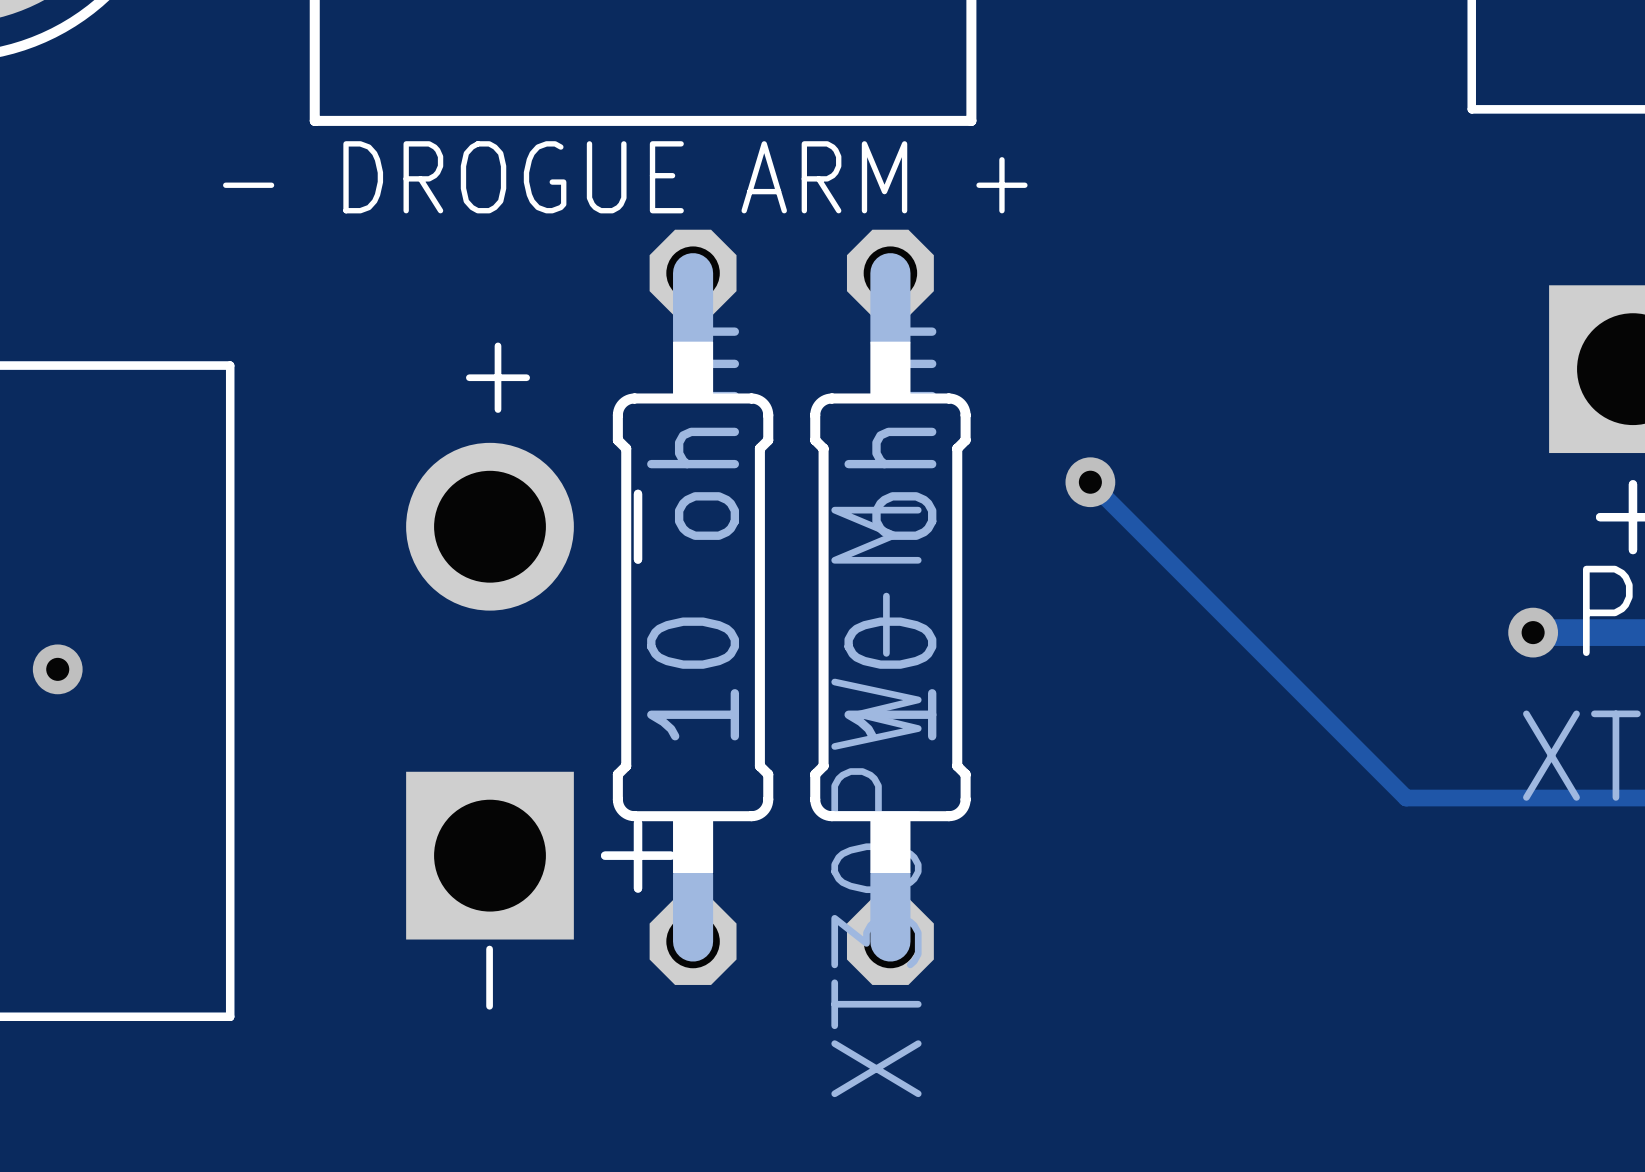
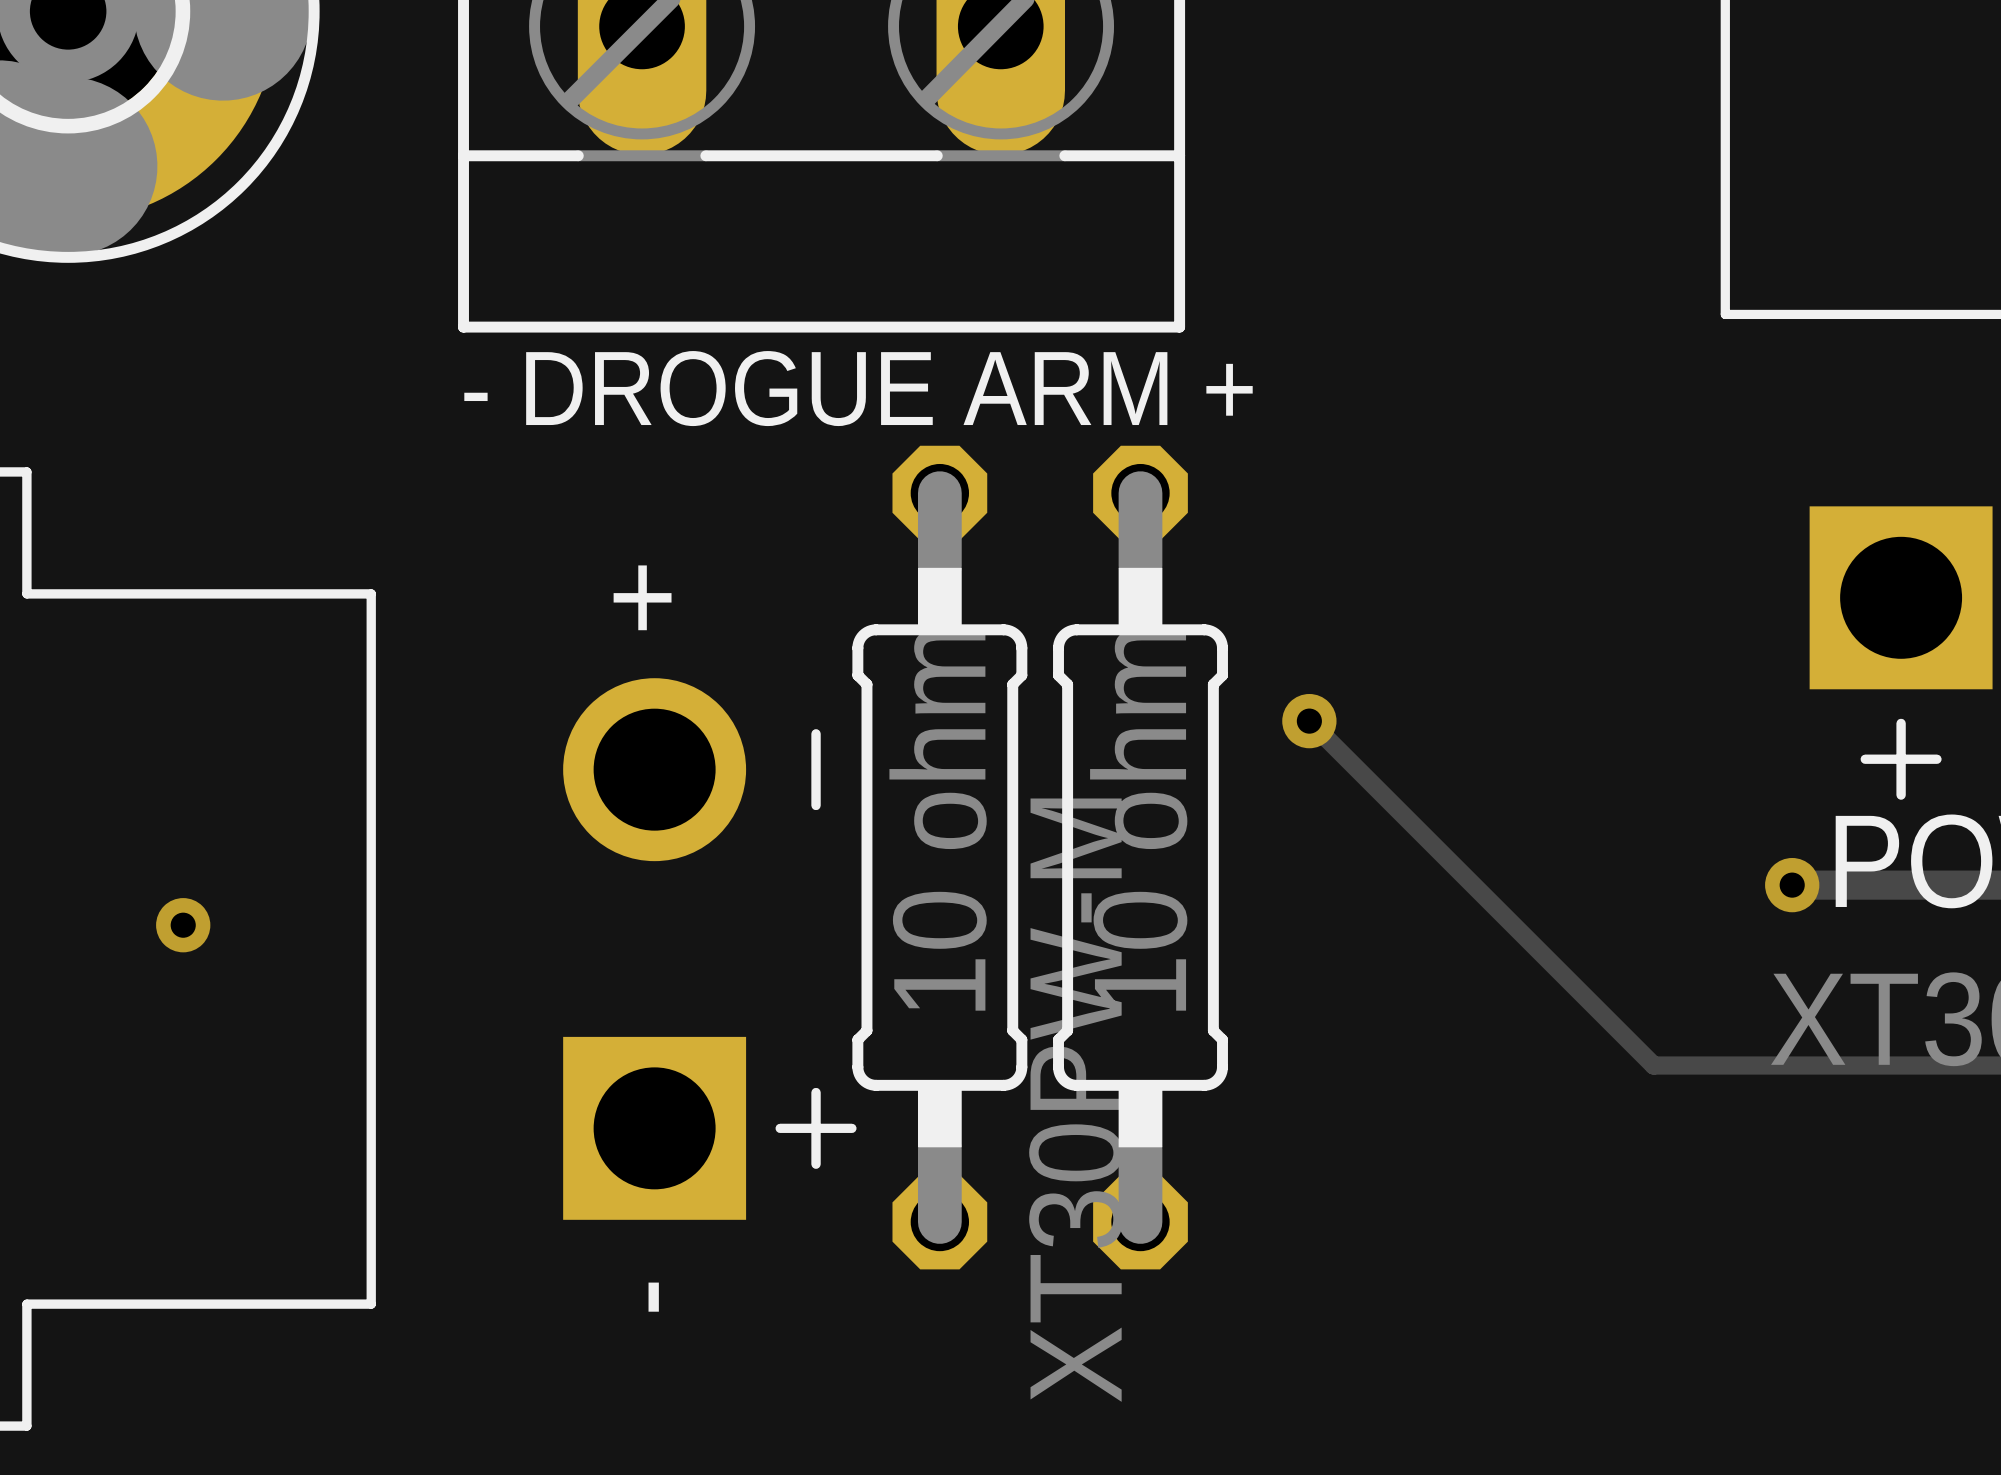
part position: (693, 607) -> (939, 857)
part position: (890, 607) -> (1140, 857)

